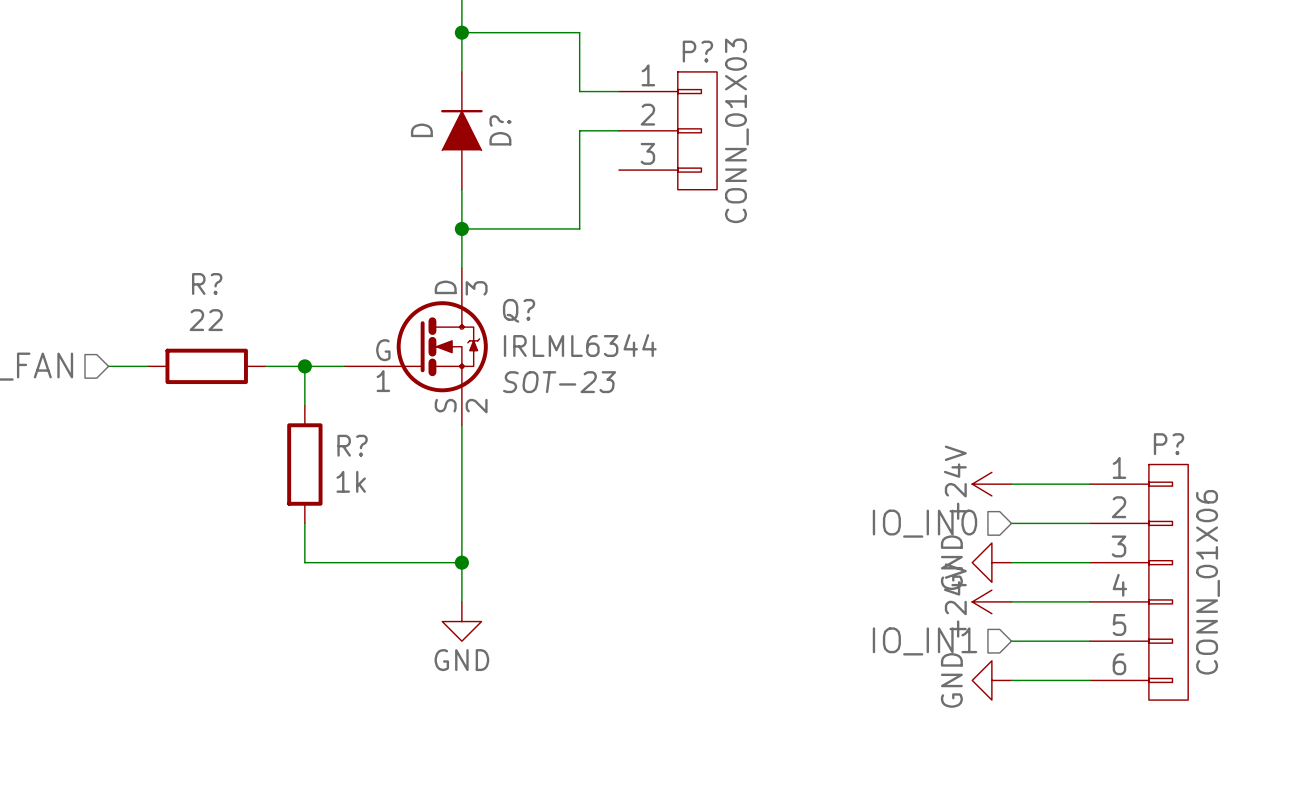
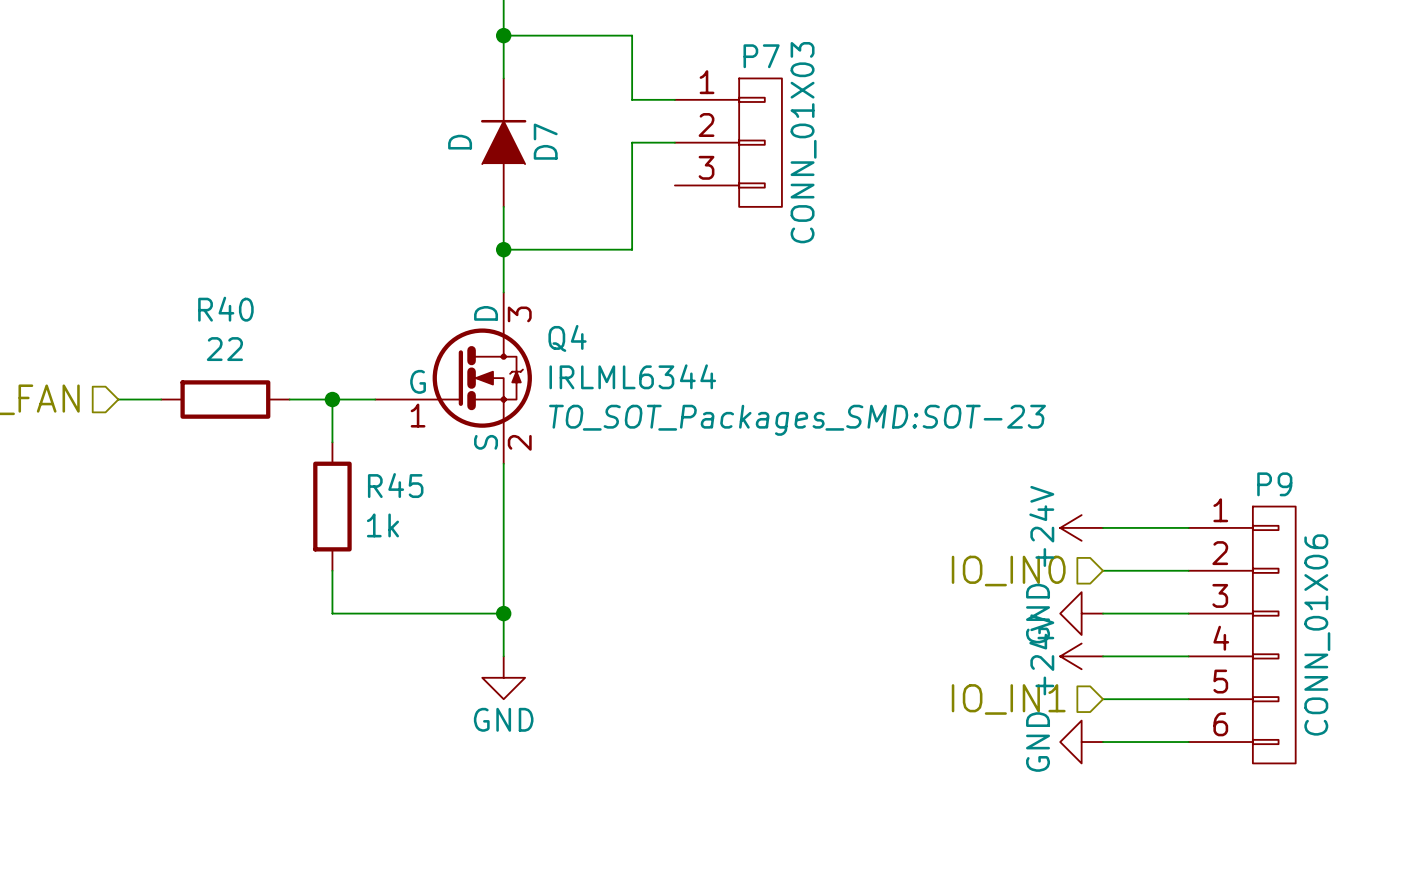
P? name: P? (697, 51) -> P7 (761, 56)
D? name: D? (500, 130) -> D7 (545, 141)
R? name: R? (207, 283) -> R40 (225, 309)
Q? name: Q? (519, 310) -> Q4 (567, 338)
Q? text: SOT-23 (559, 382) -> TO_SOT_Packages_SMD:SOT-23 (797, 420)
P? name: P? (1169, 444) -> P9 (1274, 484)
R? name: R? (352, 445) -> R45 (395, 485)

